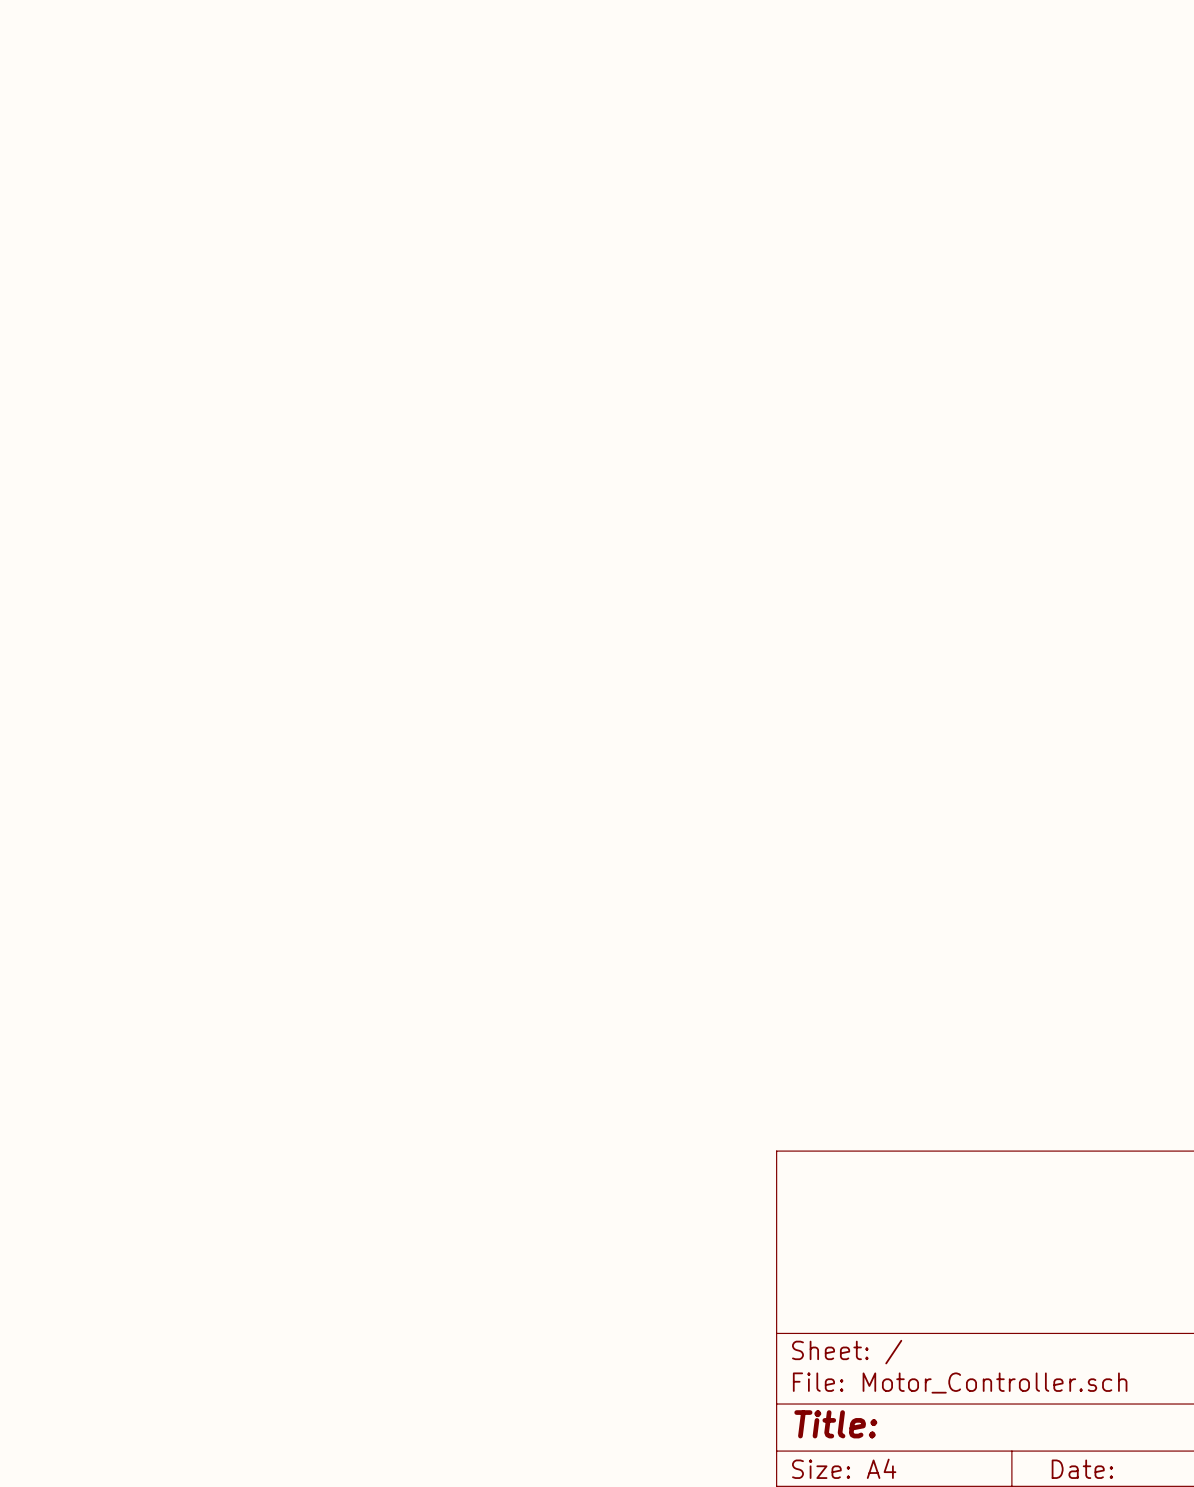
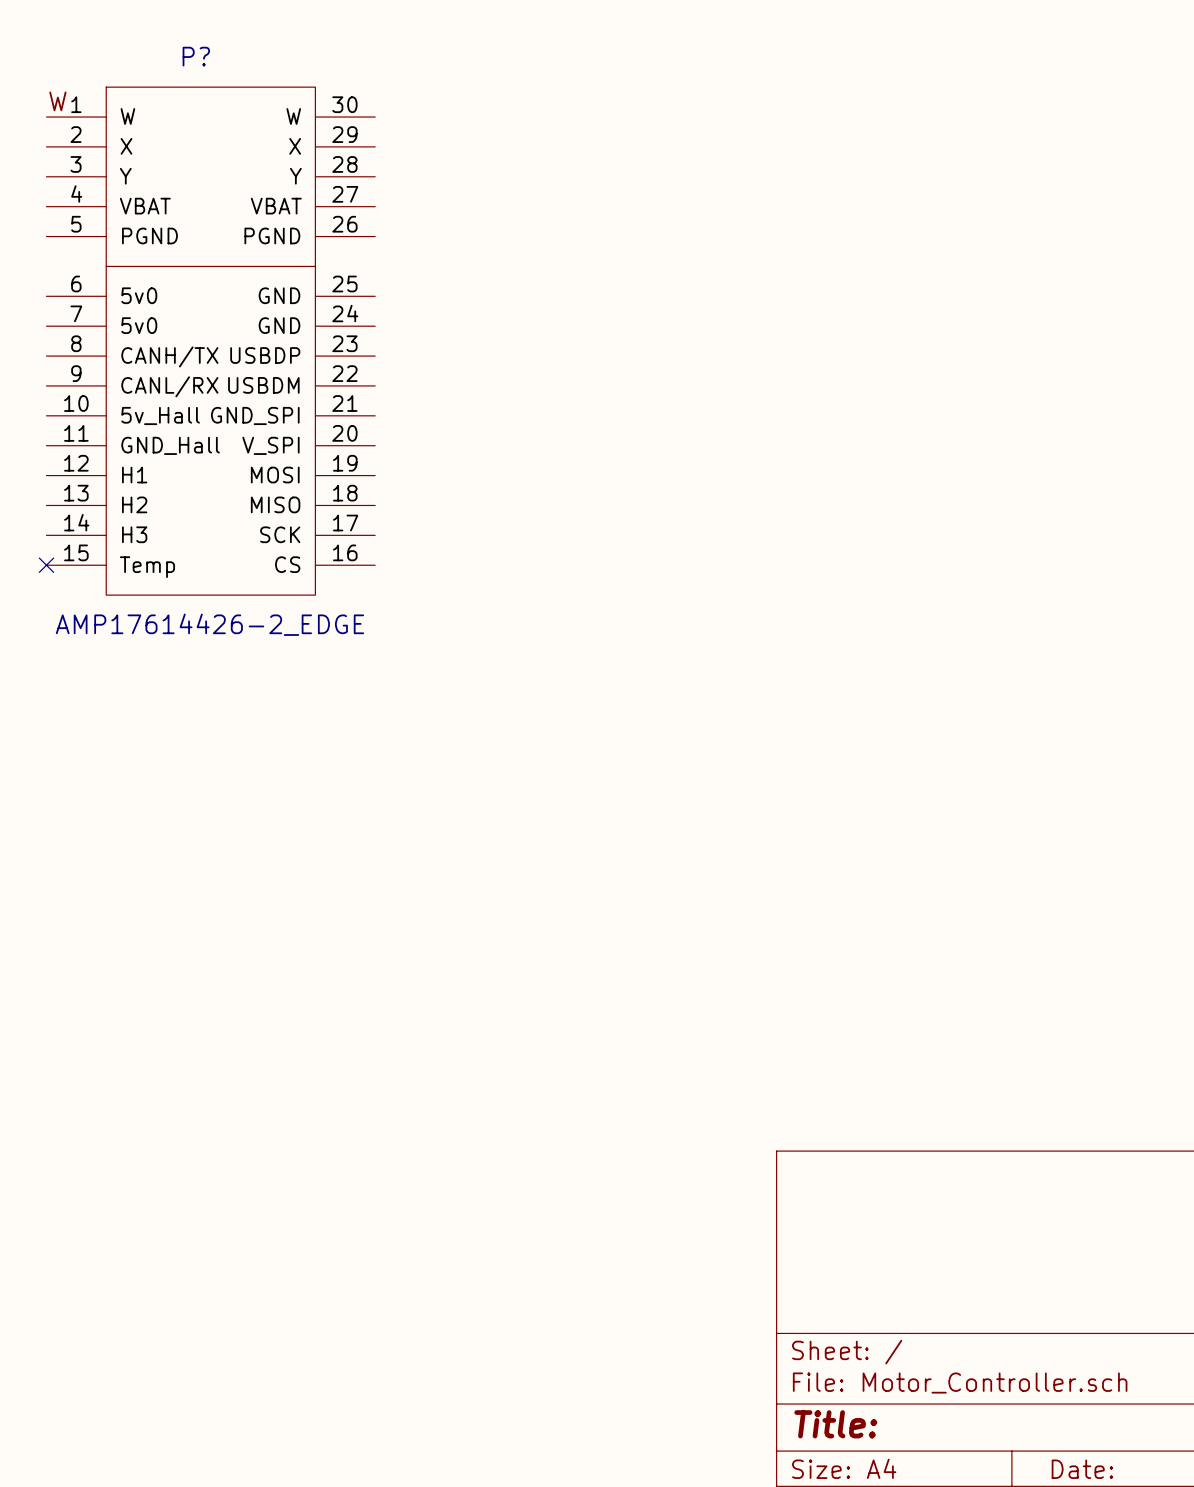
label: none -> W (57, 101)
P?: none -> AMP17614426-2_EDGE (210, 341)
no-connect mark: none -> (46, 565)

